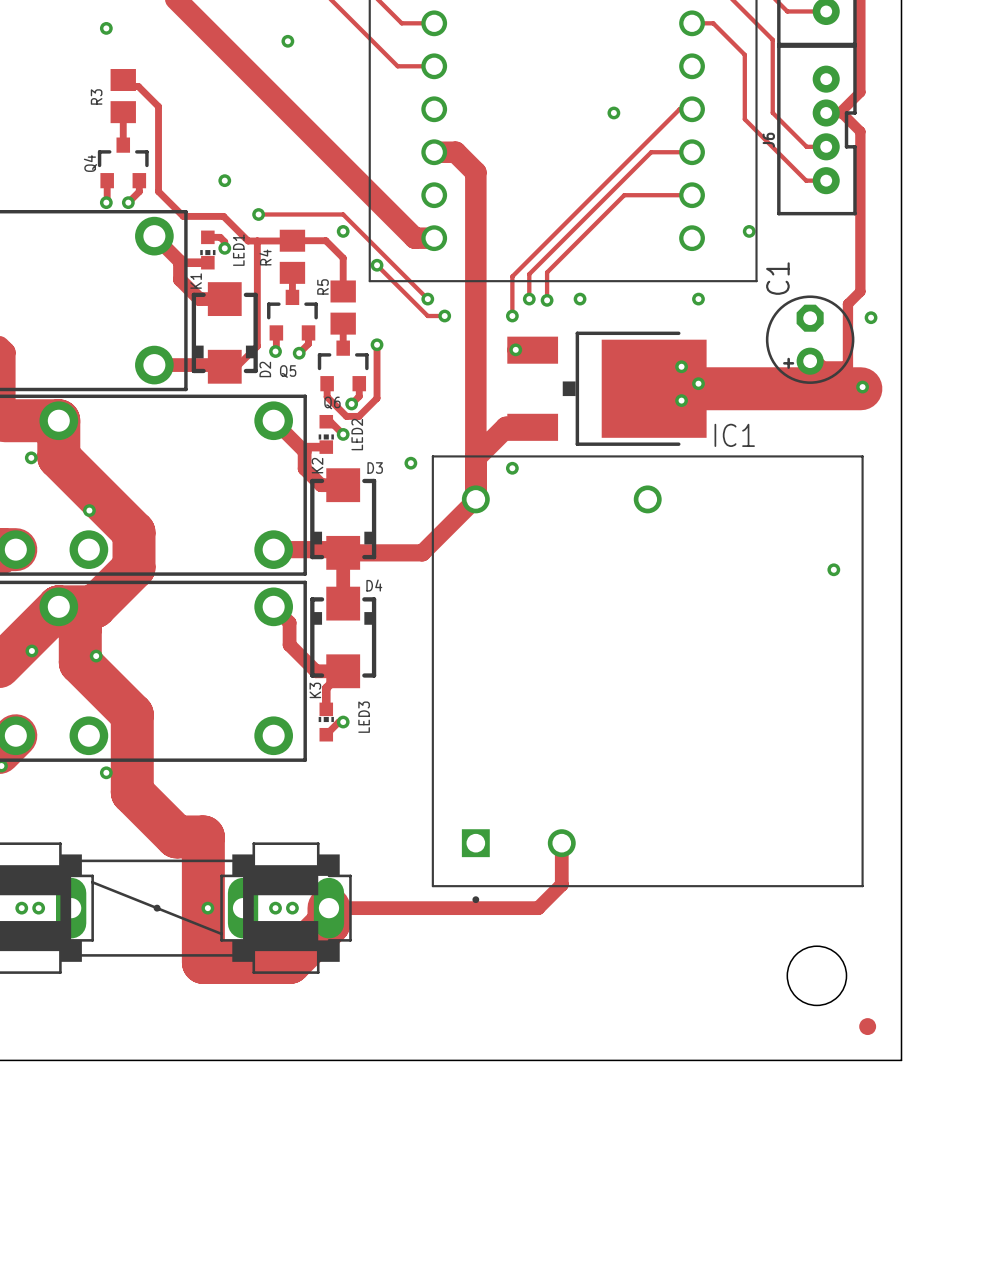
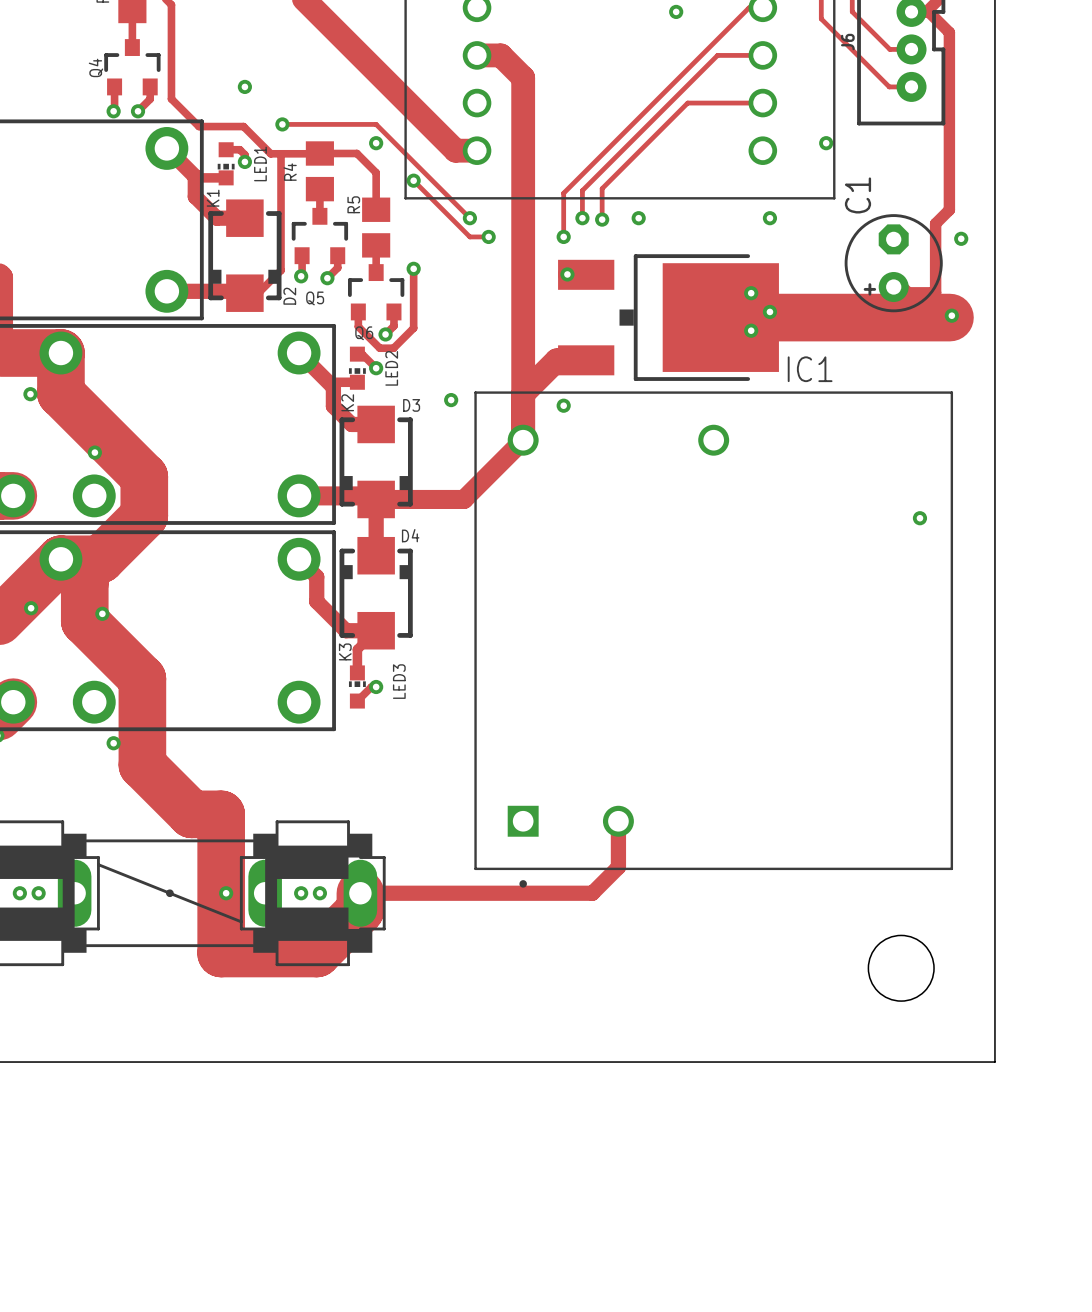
part: (867, 1026) -> none

